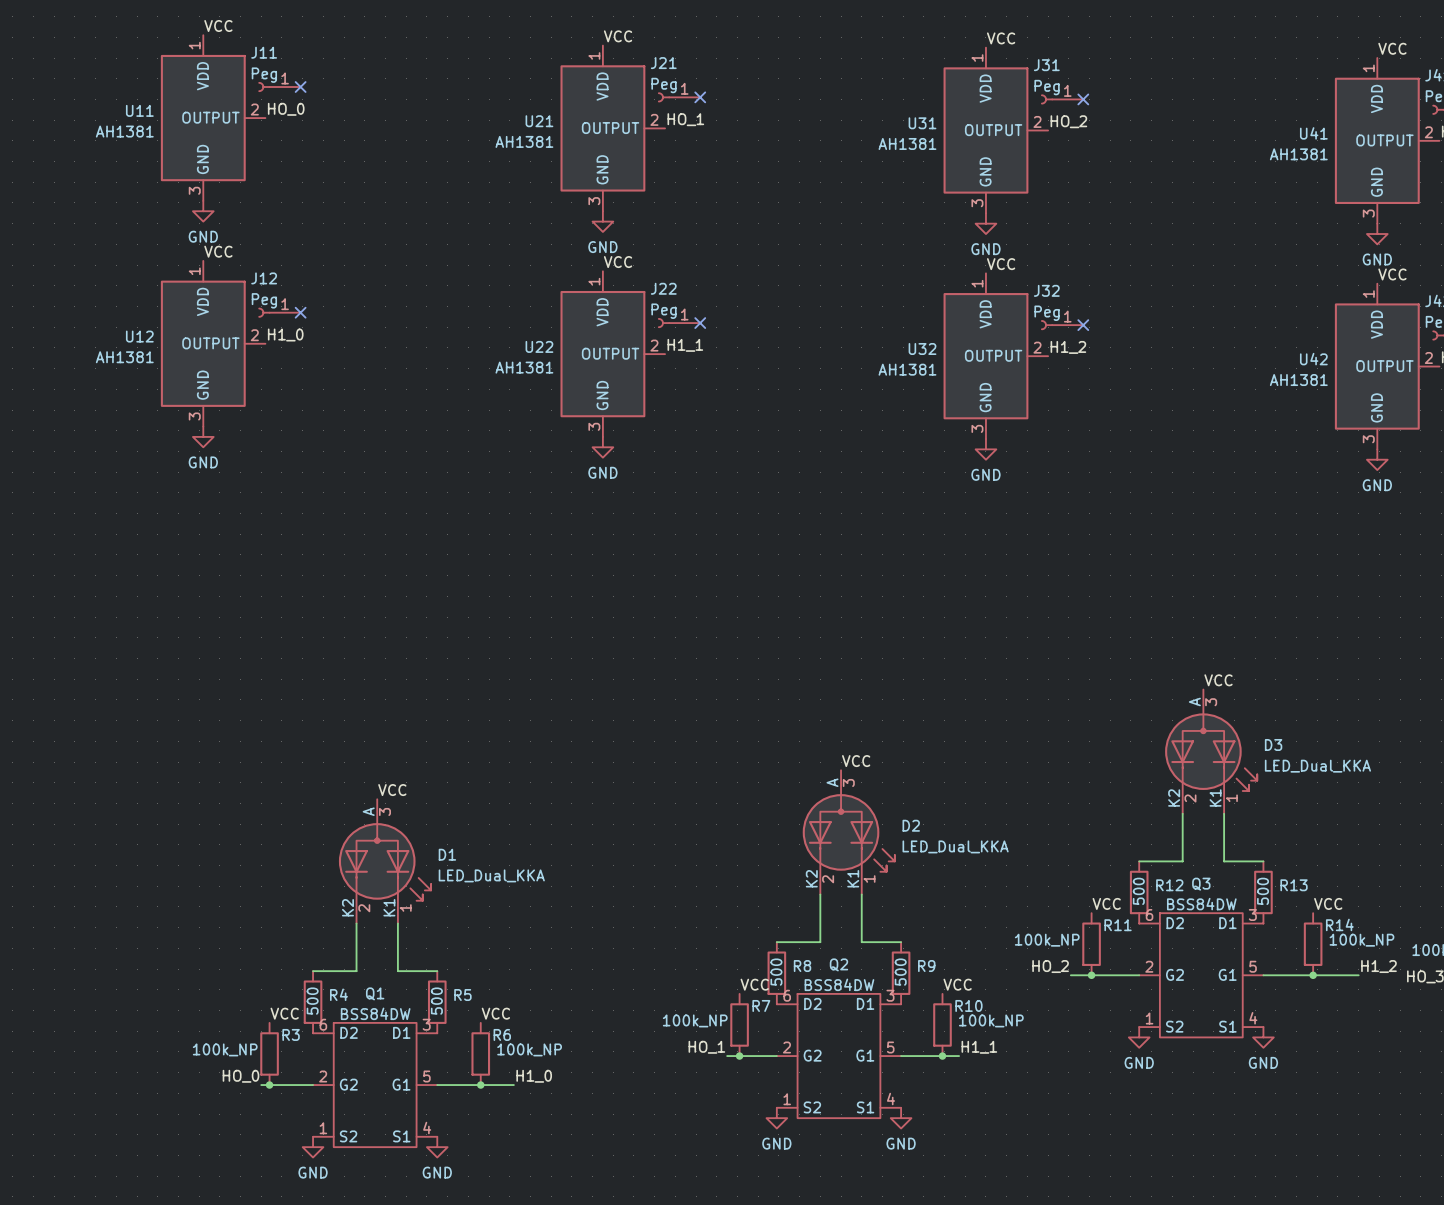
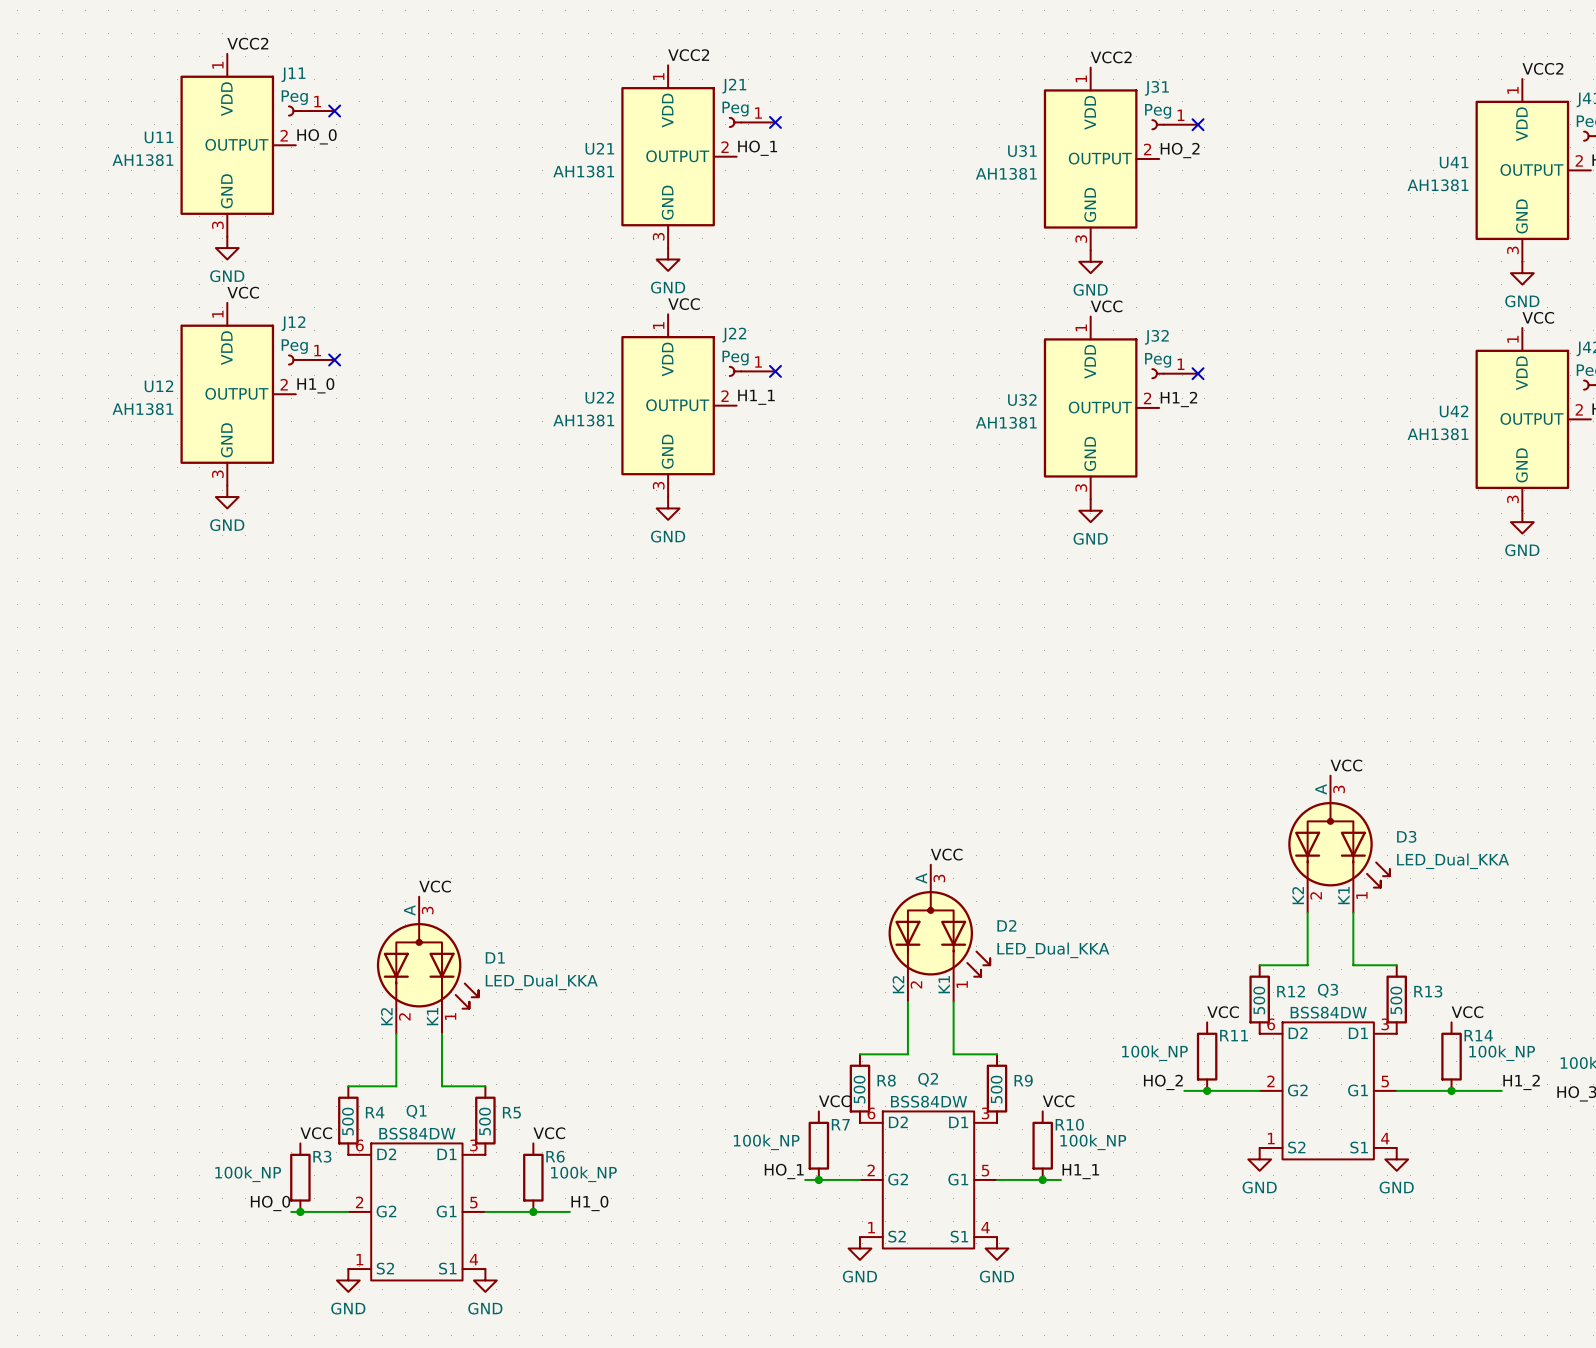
label: VCC (218, 26) -> VCC2 (247, 43)
label: VCC (618, 36) -> VCC2 (688, 55)
label: VCC (1001, 38) -> VCC2 (1111, 57)
label: VCC (1392, 48) -> VCC2 (1542, 68)

